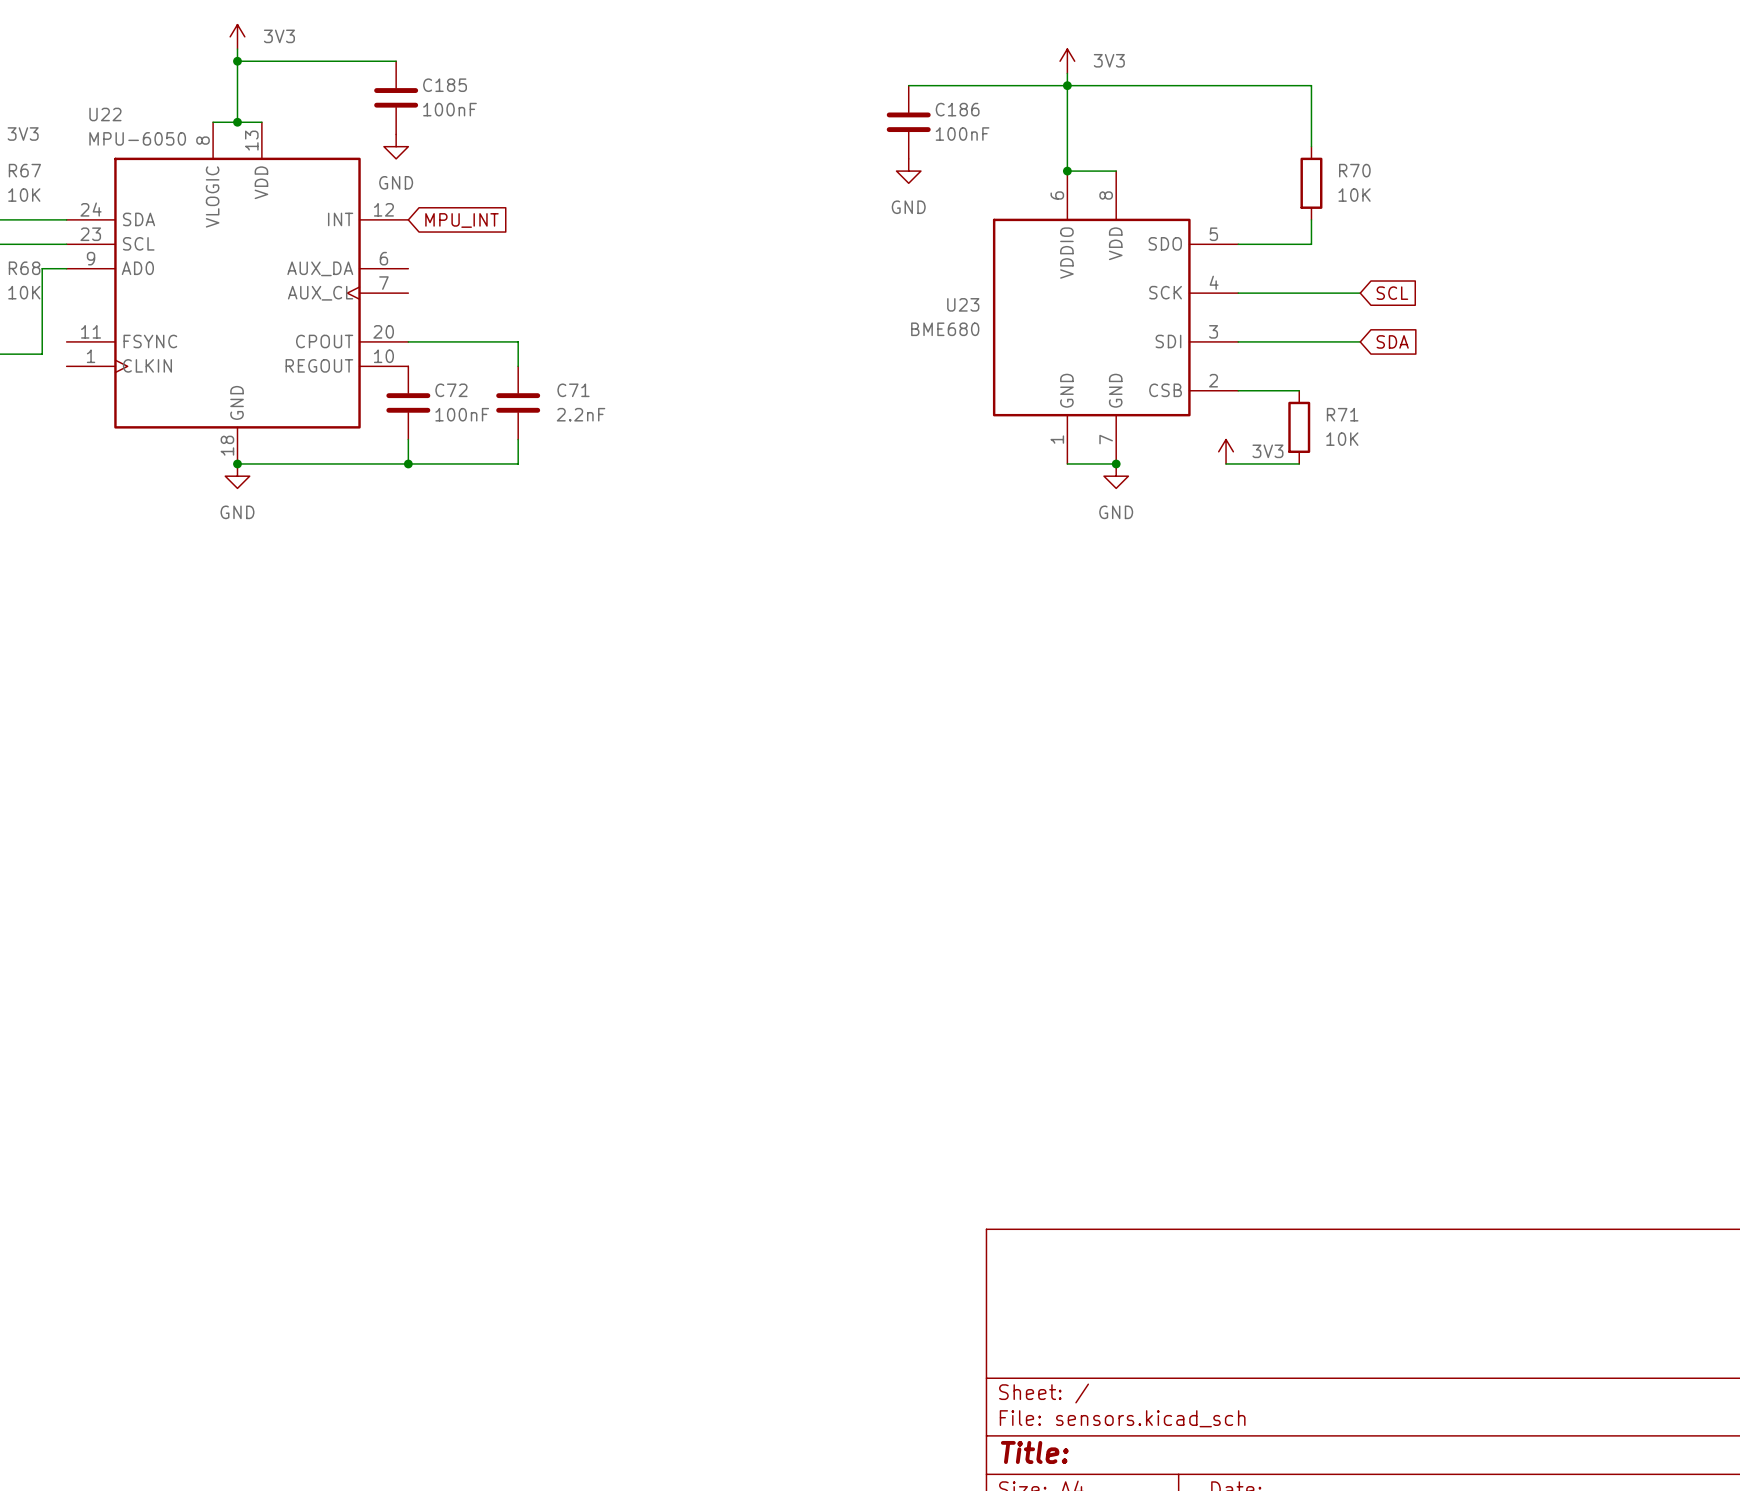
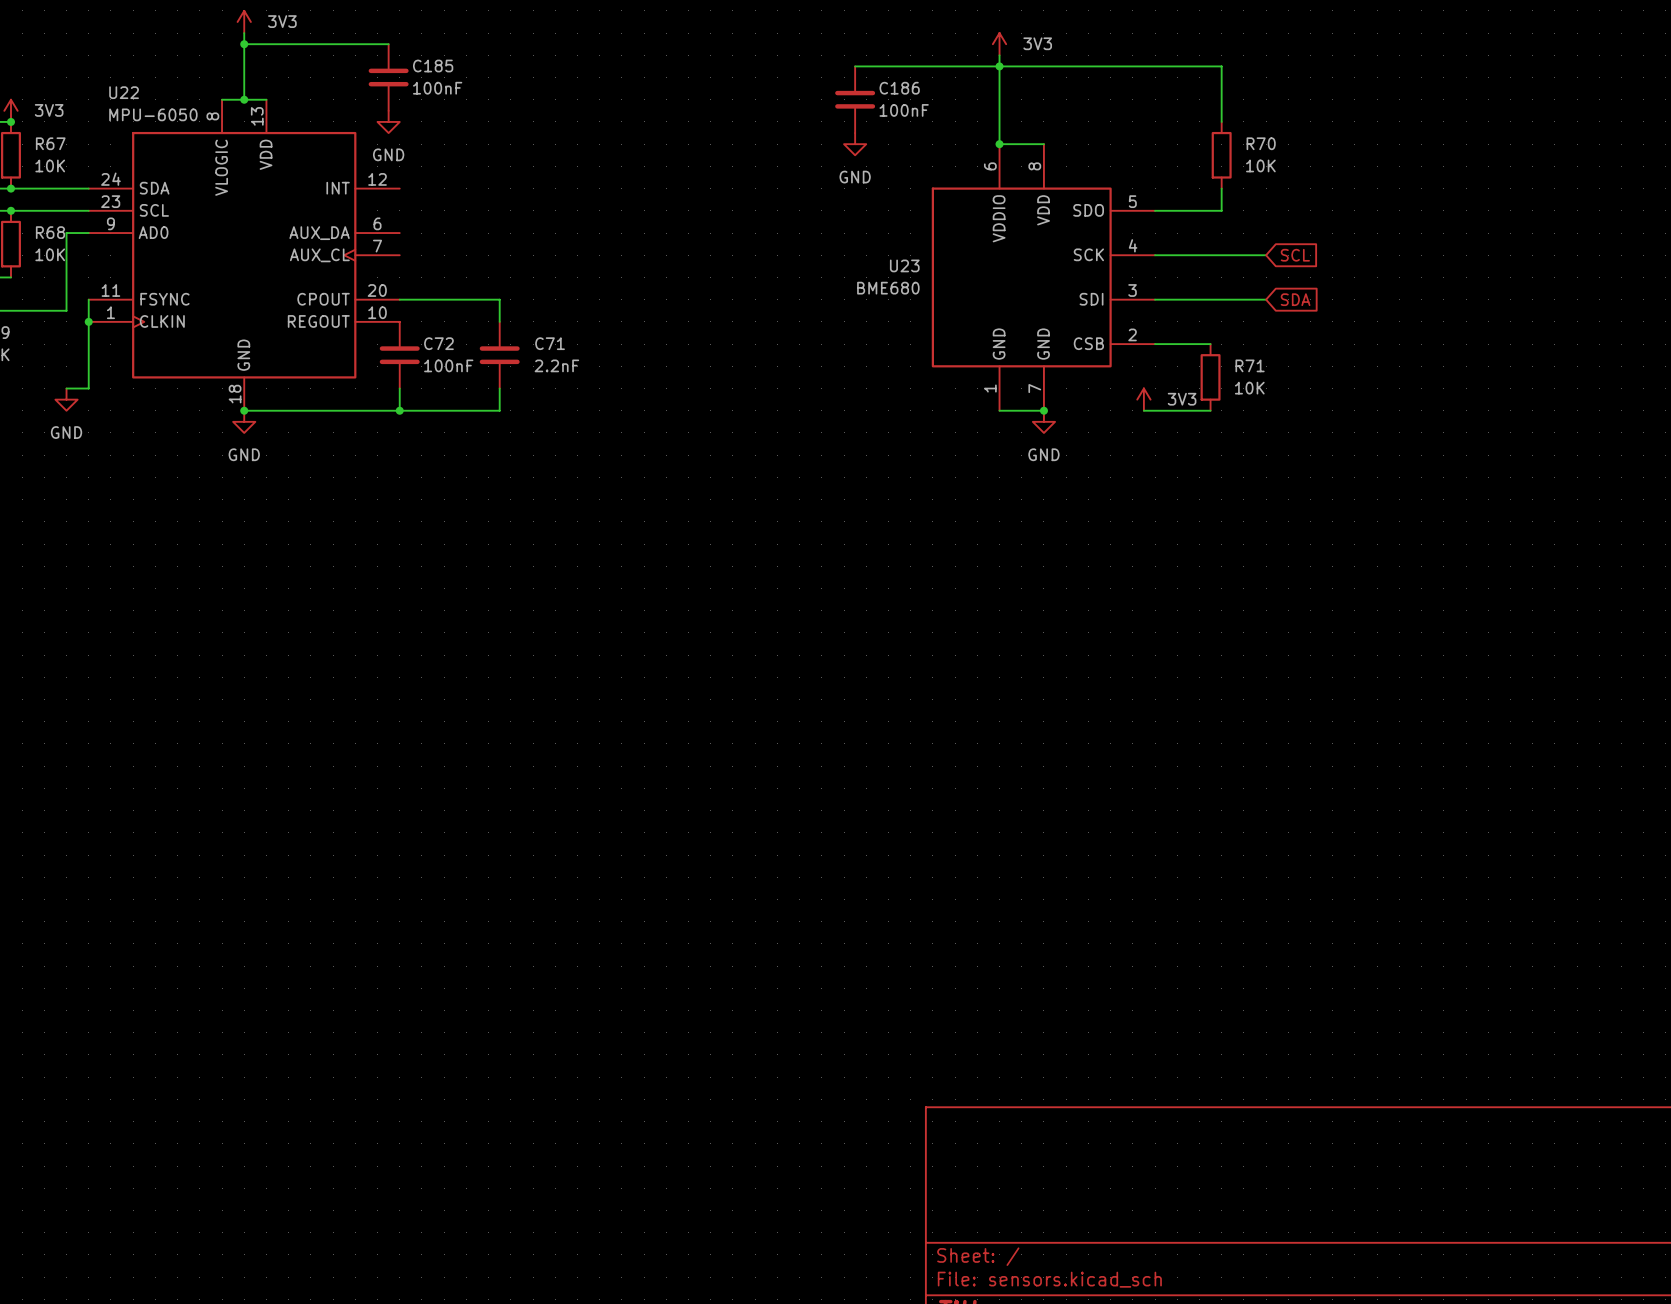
global label: MPU_INT (461, 220) -> none
wire: none -> (88, 299) (88, 388) (66, 388)
junction: none -> (88, 321)
power symbol: none -> GND (66, 399)

